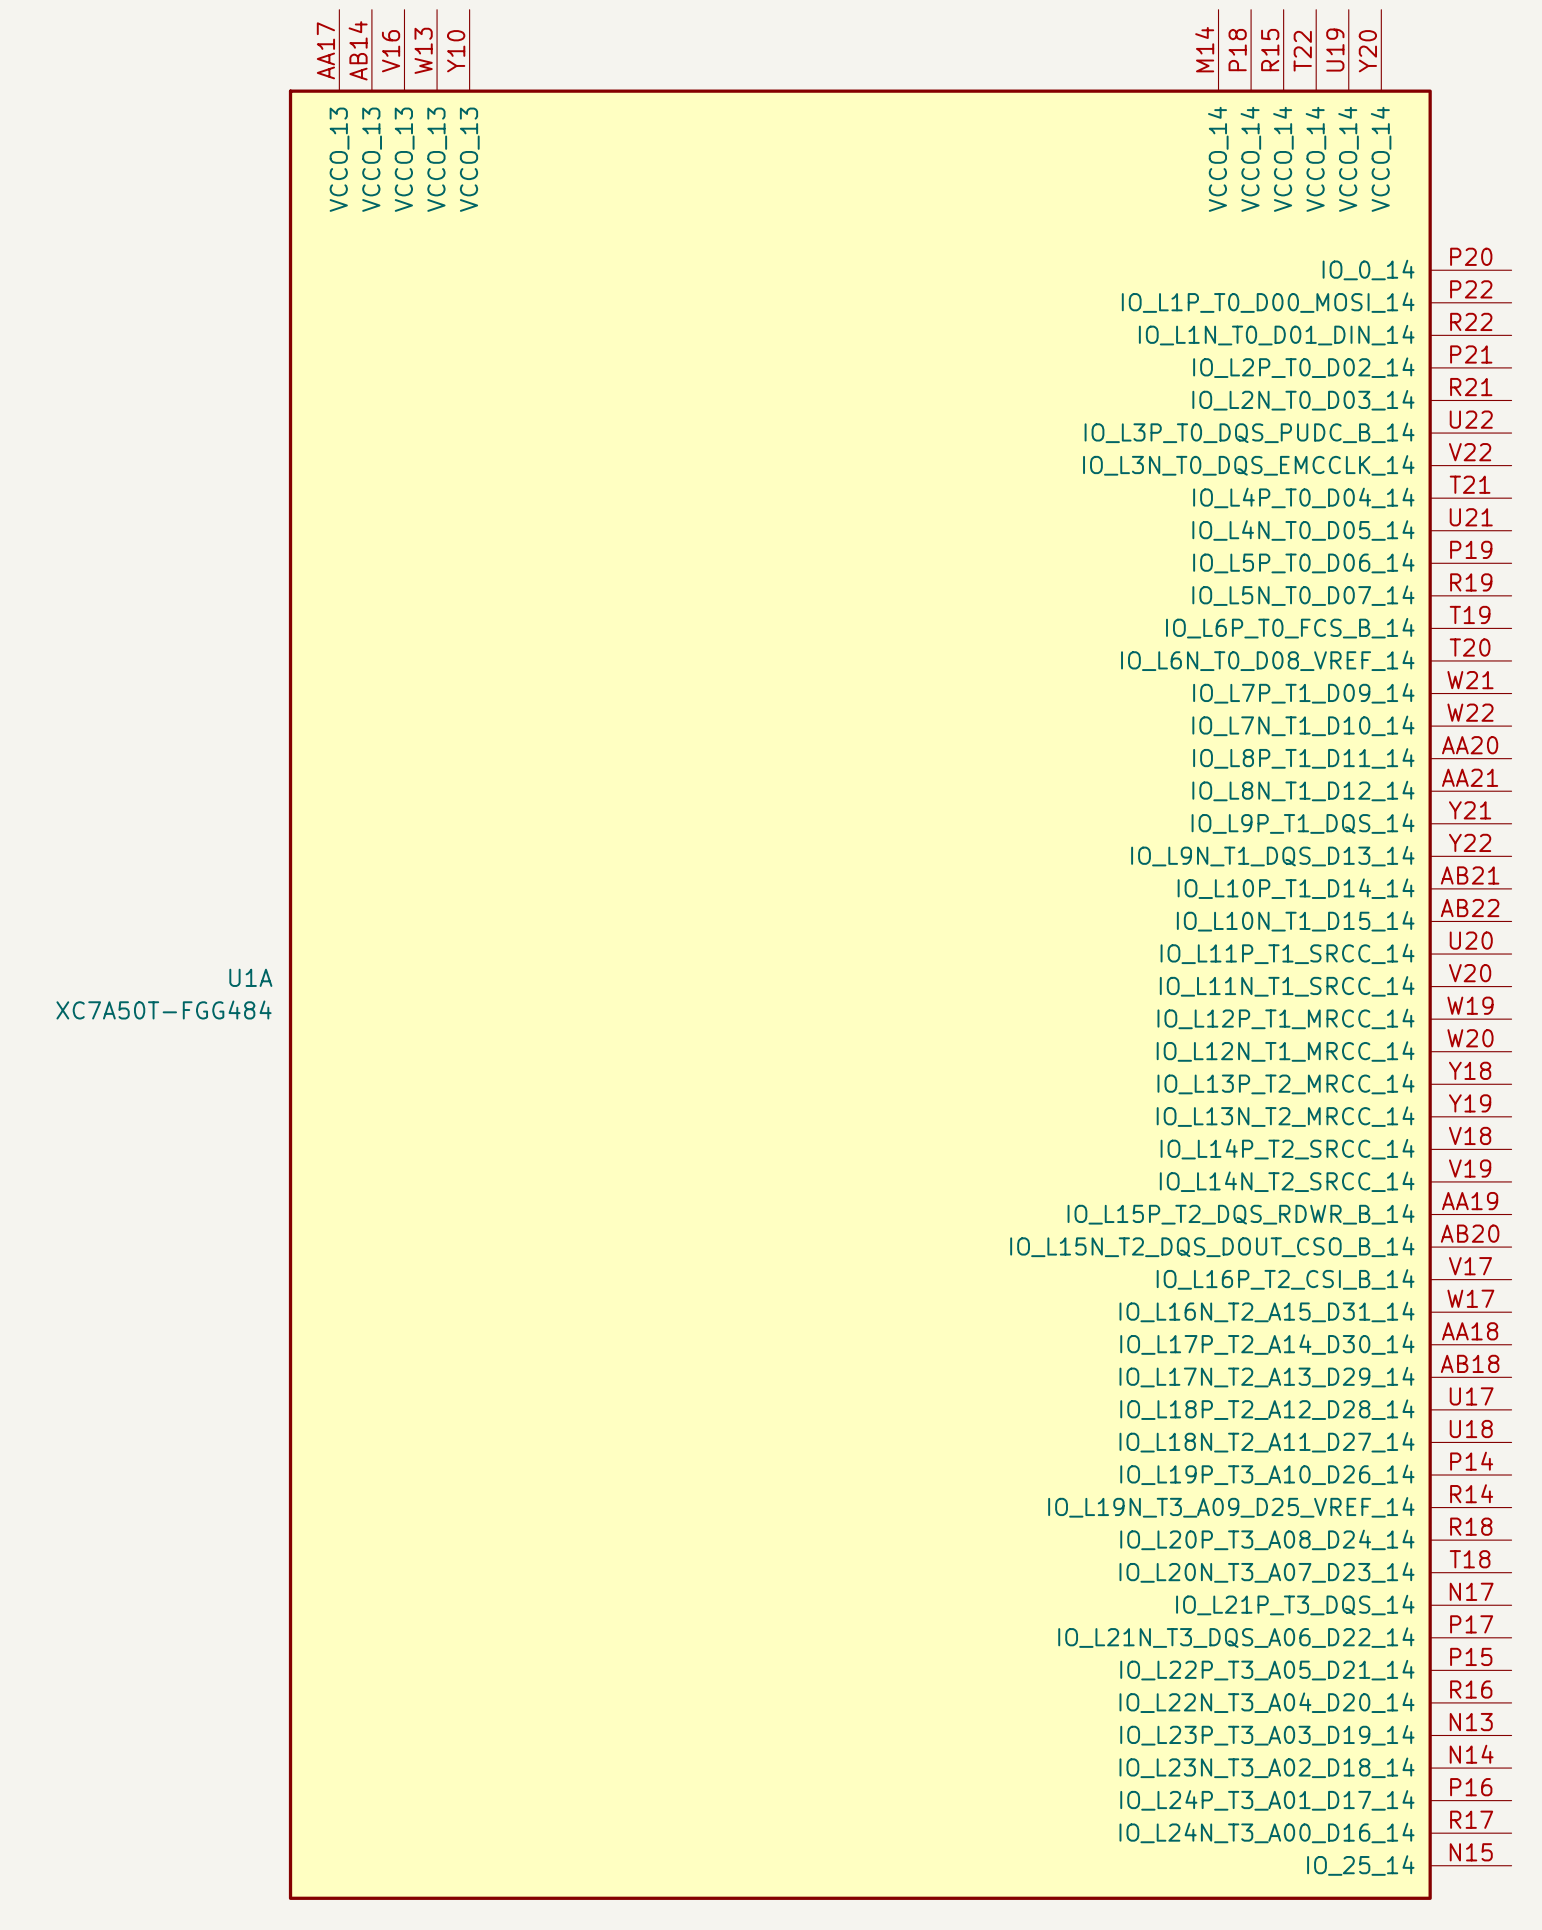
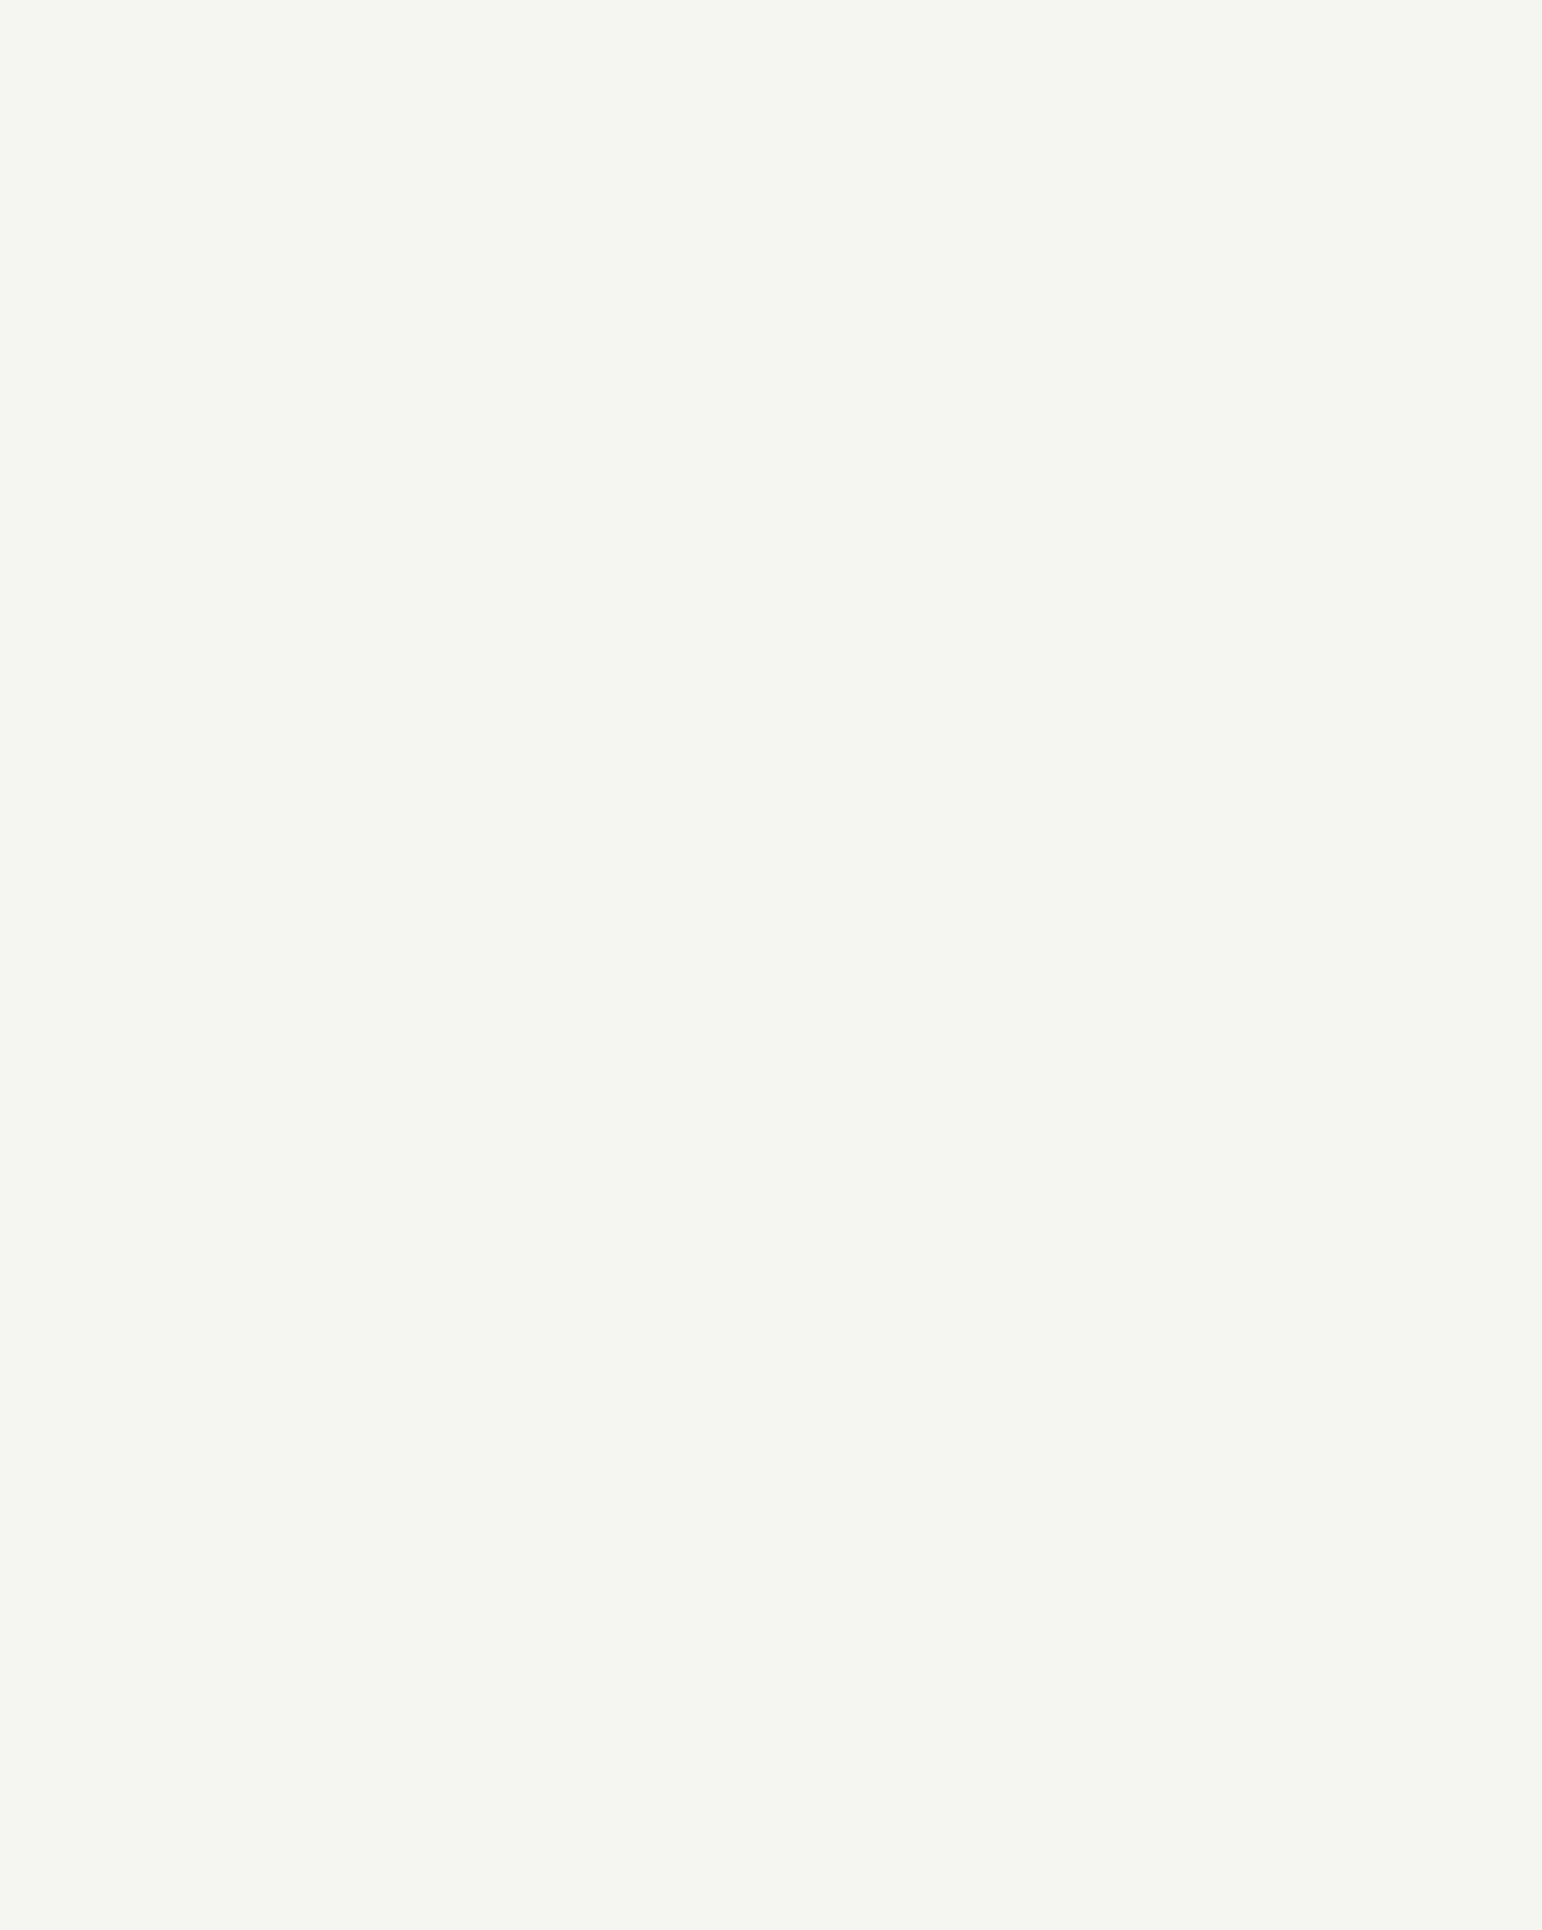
U1A: XC7A50T-FGG484 (900, 954) -> none

